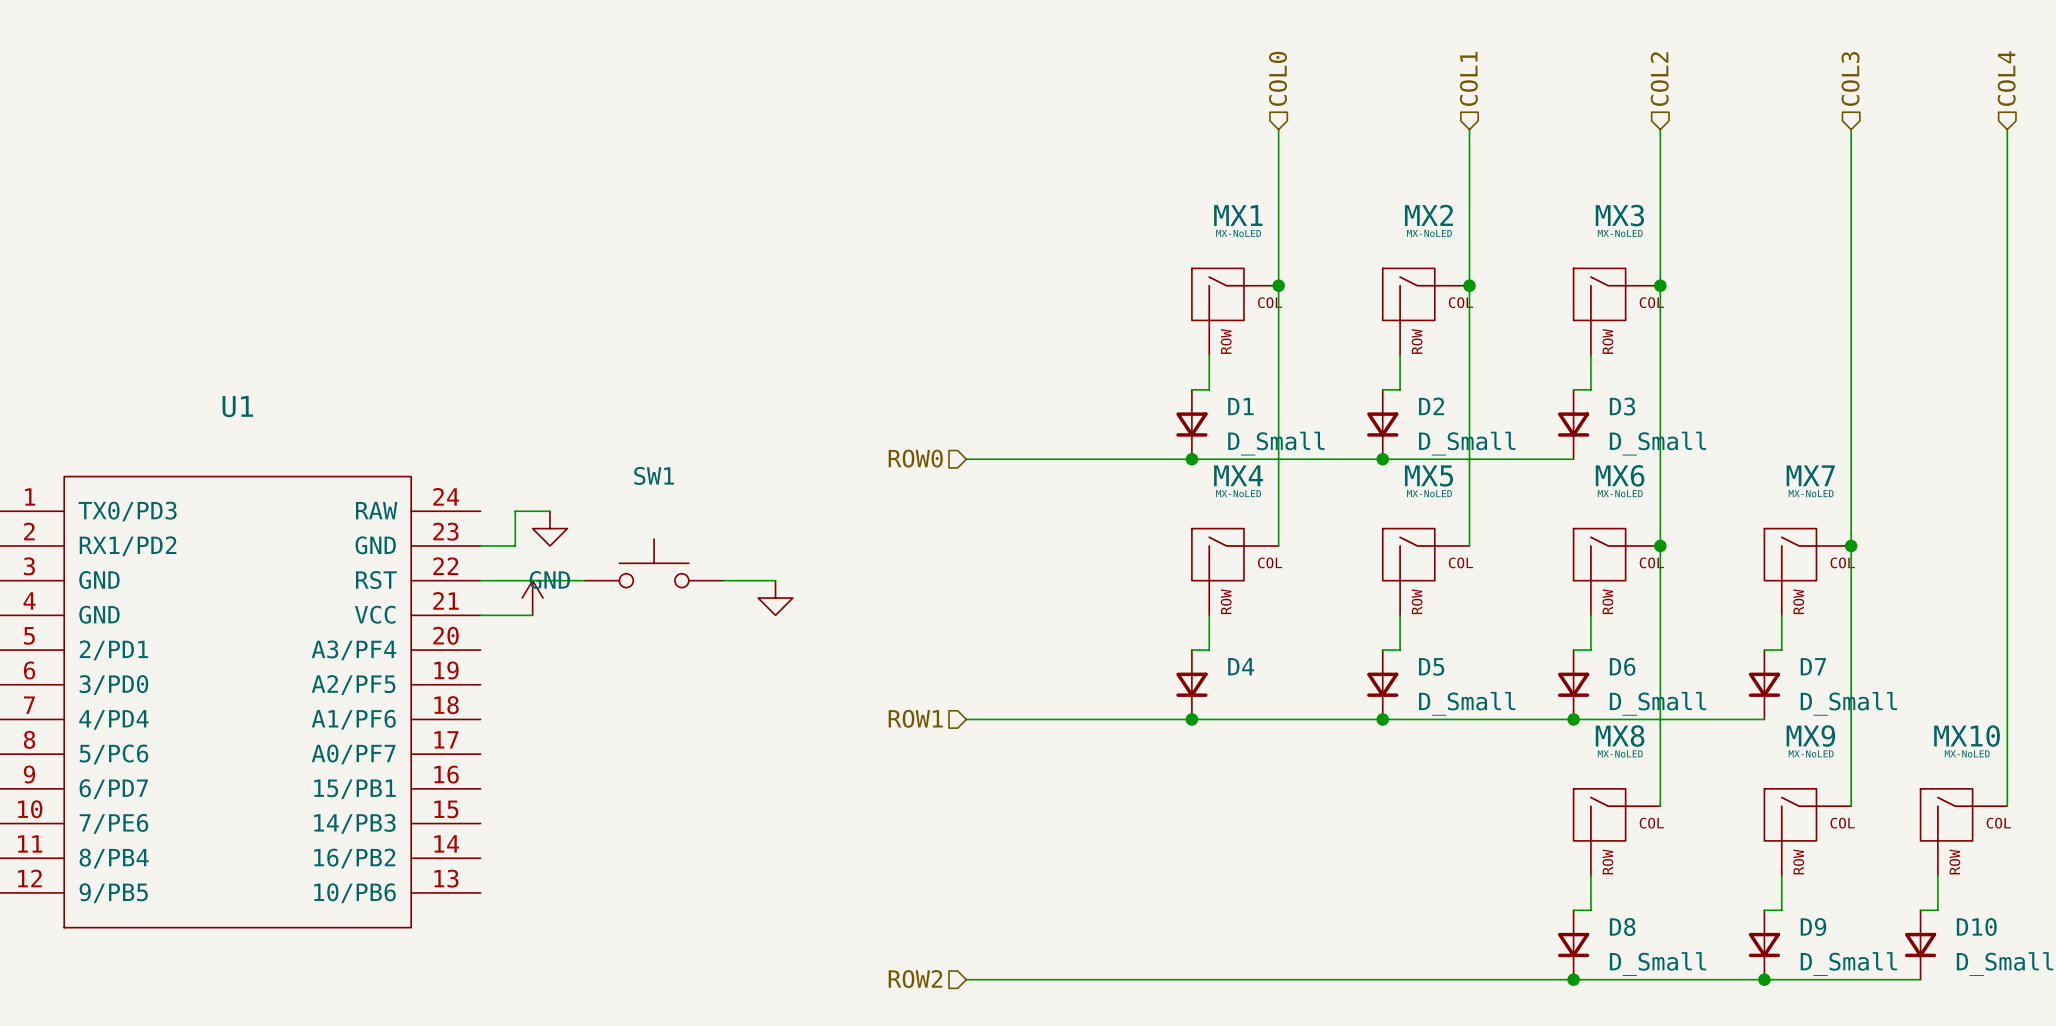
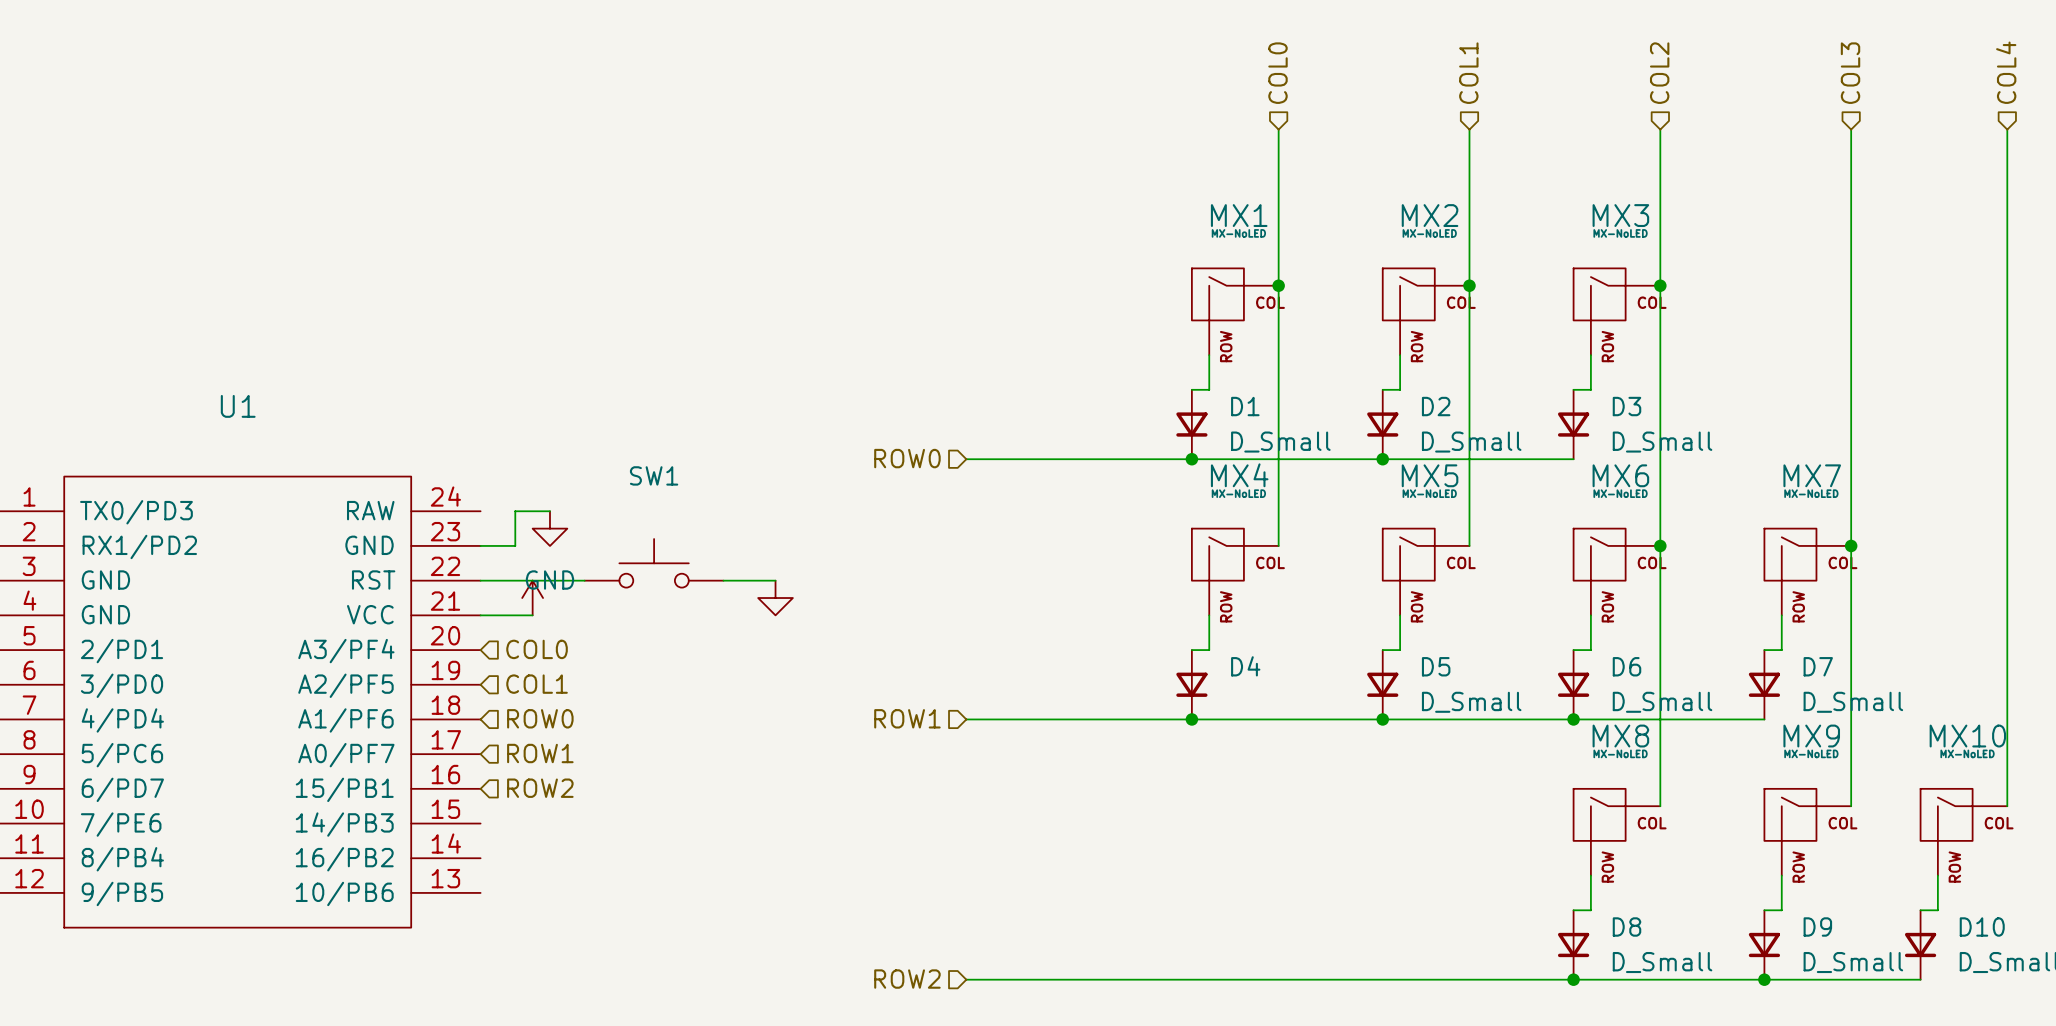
hierarchical label: none -> COL0 (537, 649)
hierarchical label: none -> COL1 (537, 684)
hierarchical label: none -> ROW0 (540, 718)
hierarchical label: none -> ROW1 (540, 753)
hierarchical label: none -> ROW2 (540, 788)

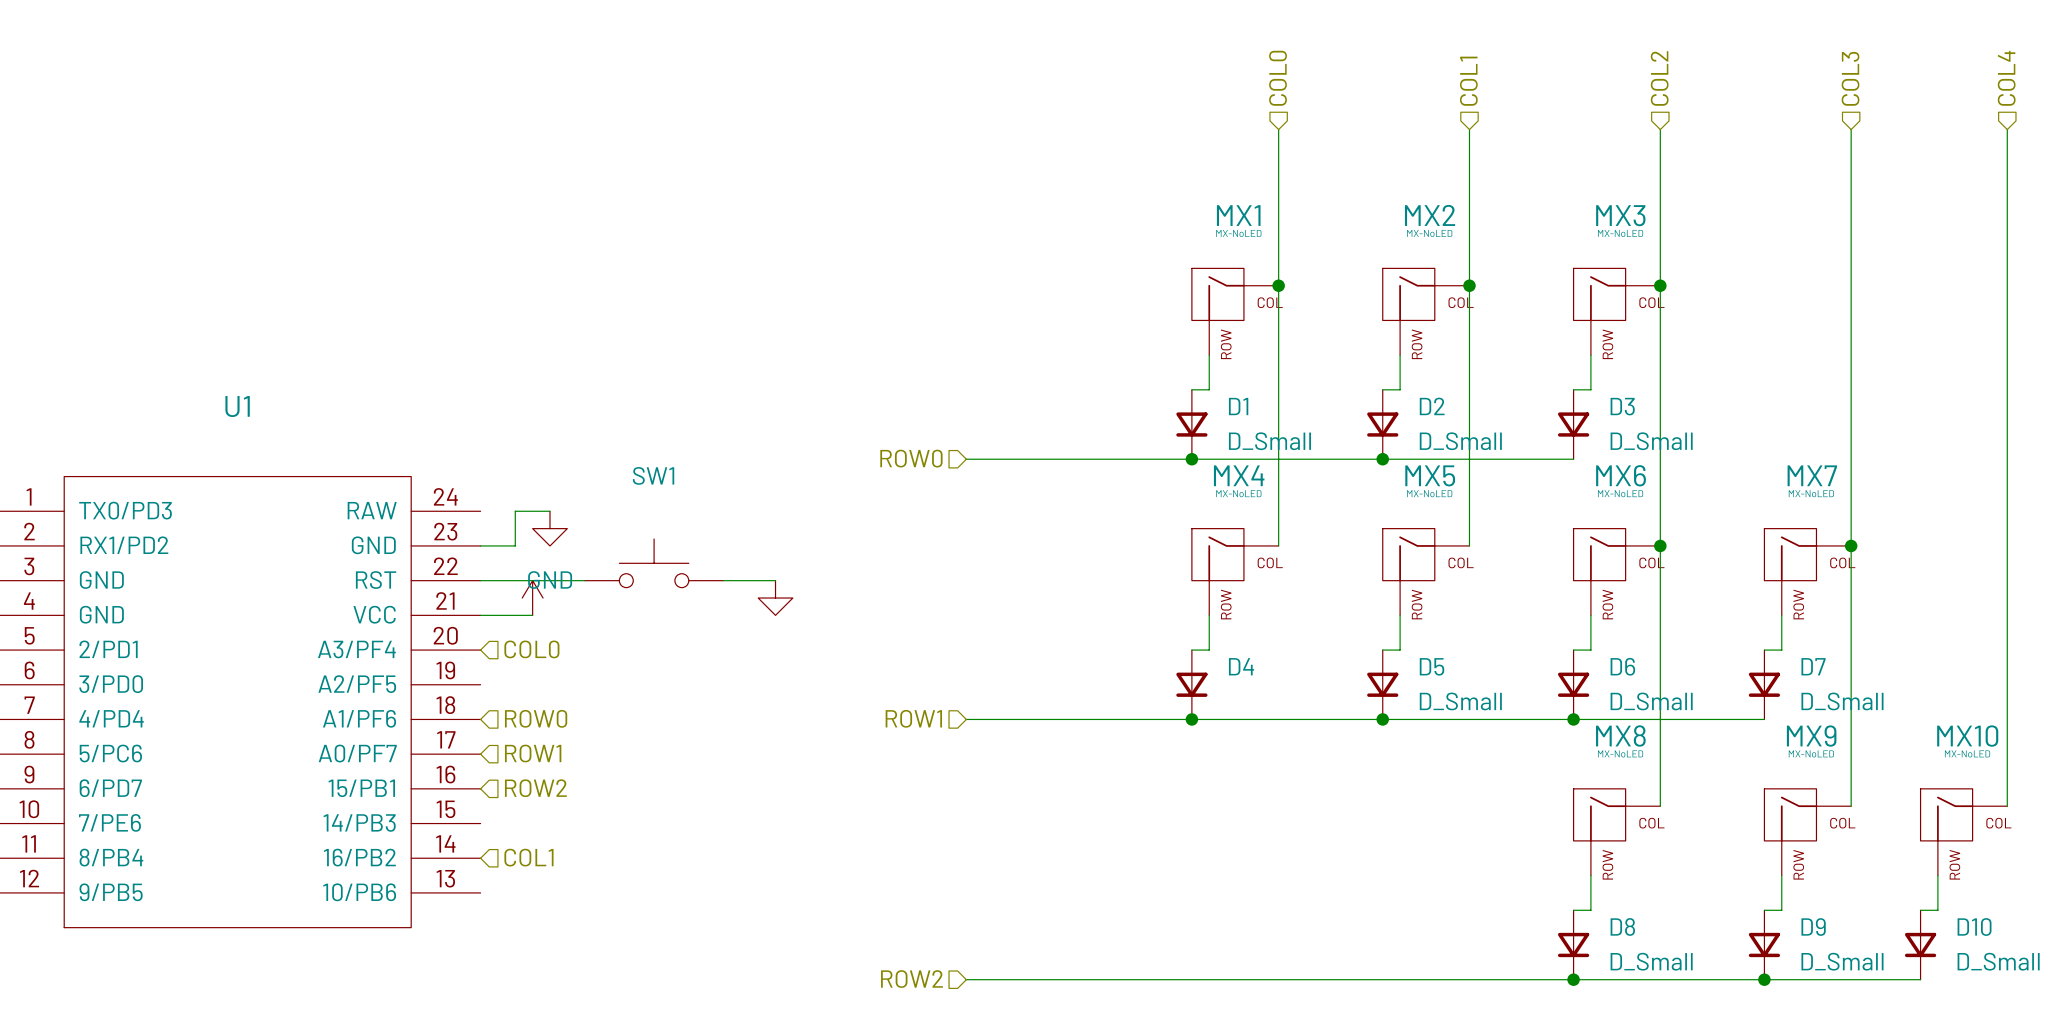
hierarchical label position: COL1 (537, 684) -> COL1 (528, 857)

